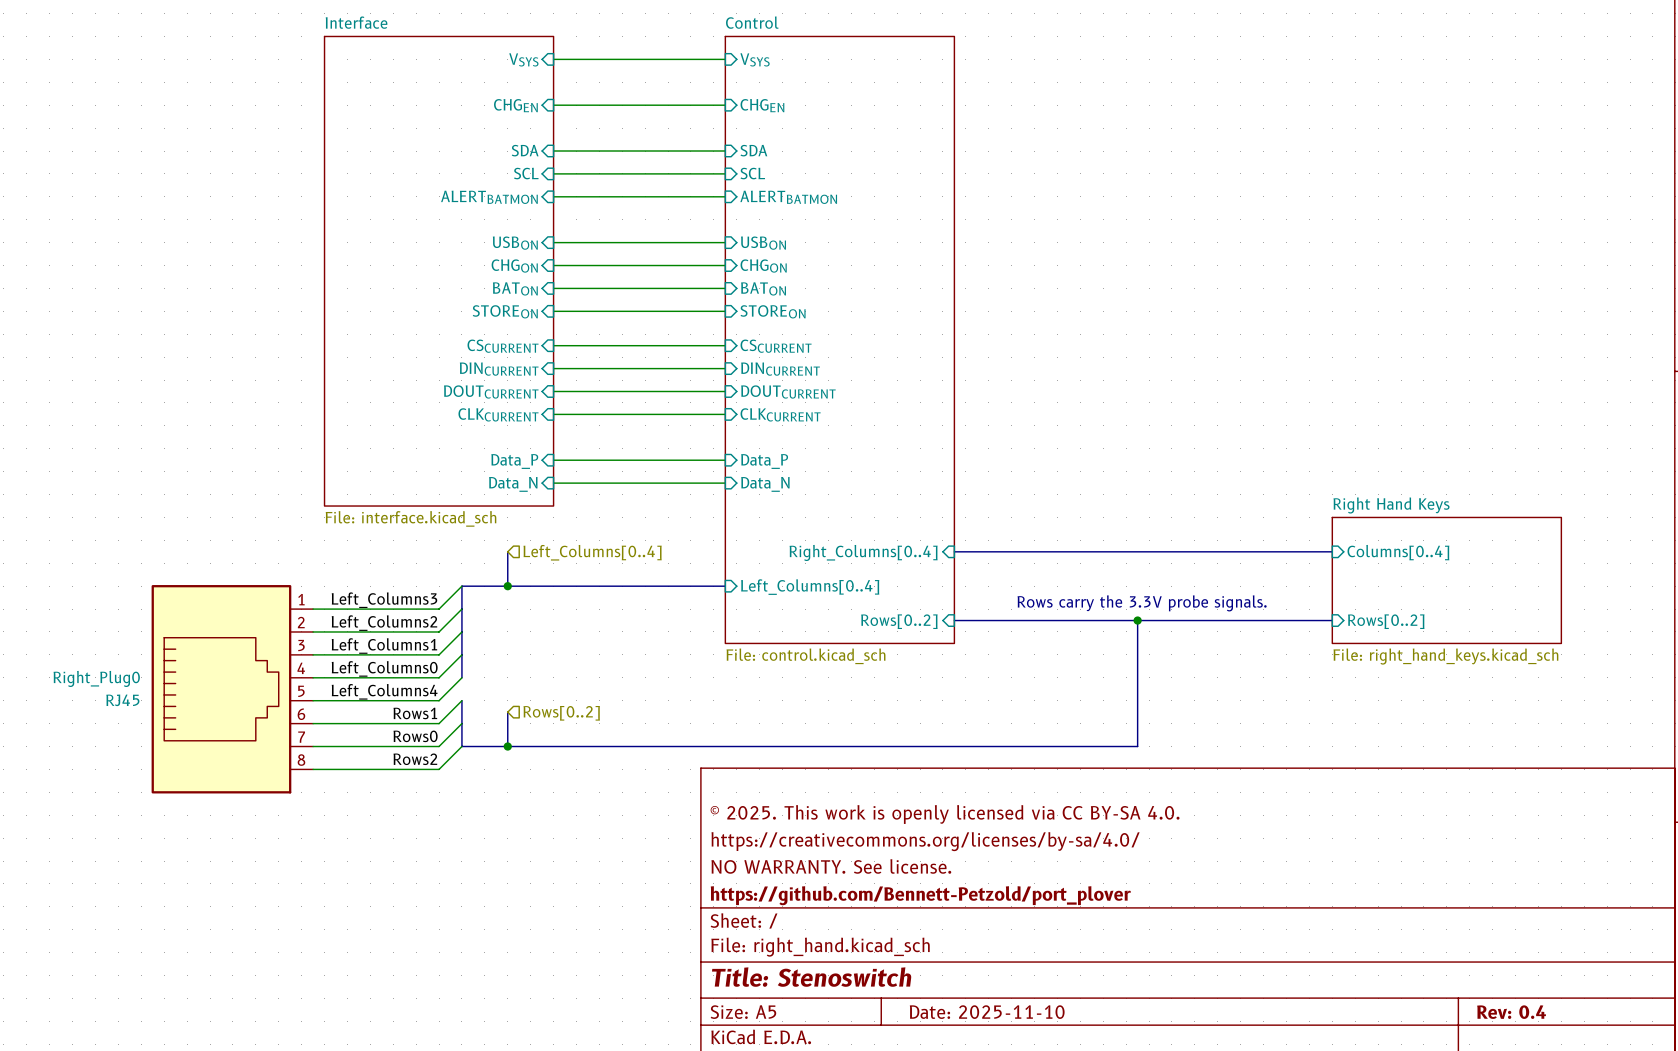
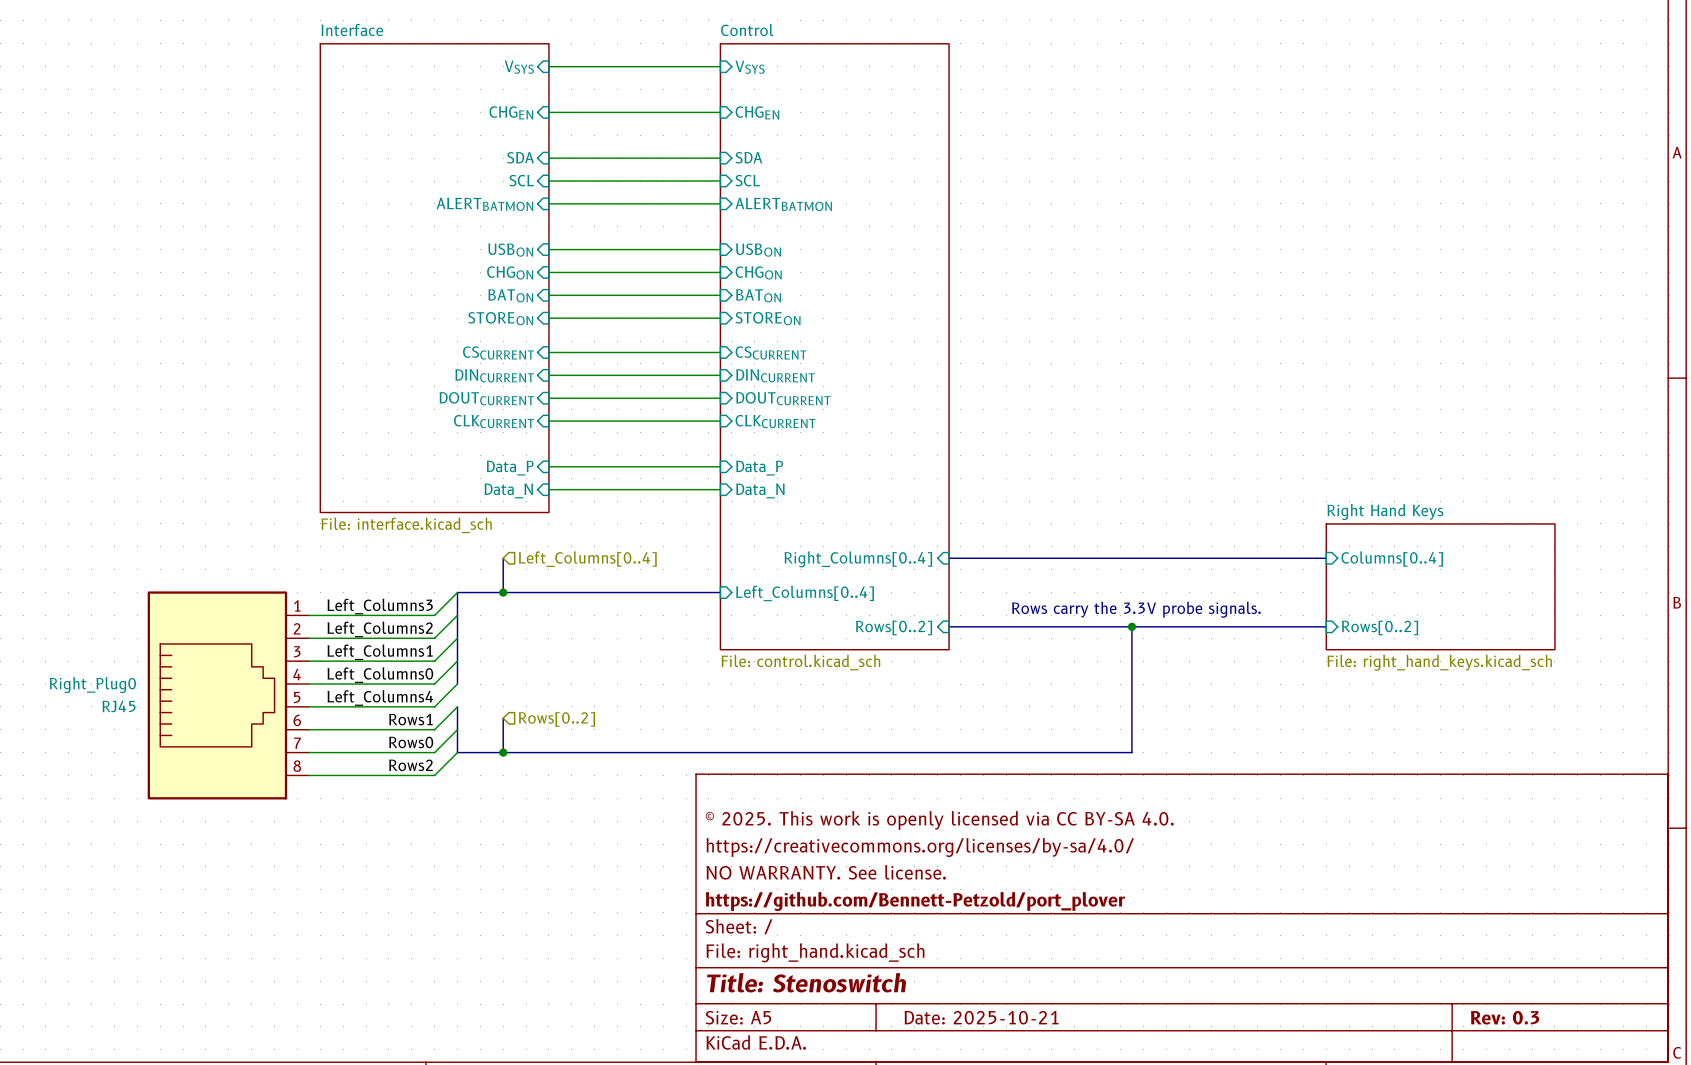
title block: Date: 2025-11-10 (987, 1012) -> Date: 2025-10-21 (981, 1017)
title block: Rev: 0.4 (1511, 1012) -> Rev: 0.3 (1505, 1017)

